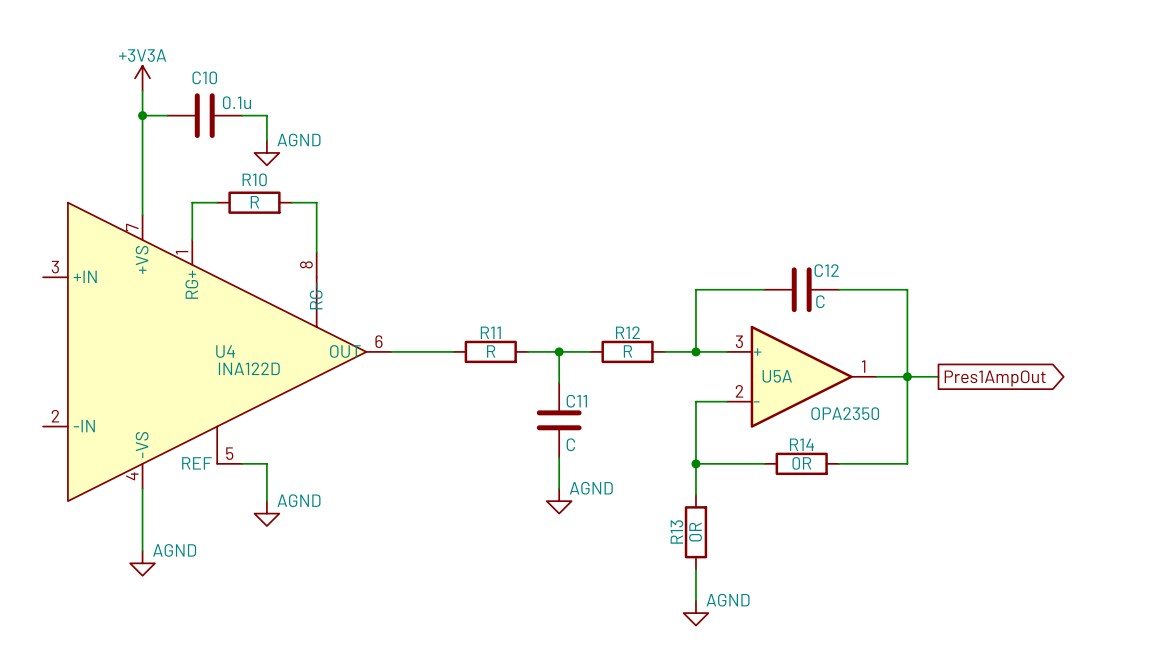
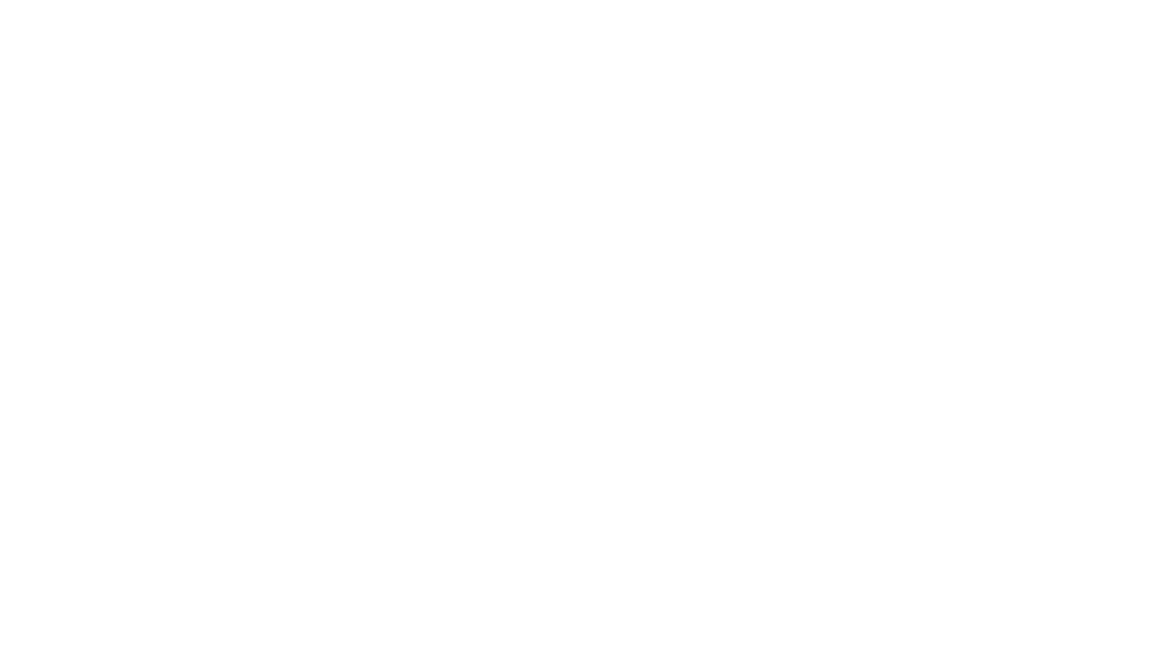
power symbol: +3V3A (142, 78) -> none
wire: (142, 90) (142, 215) -> none
wire: (142, 115) (167, 115) -> none
junction: (142, 115) -> none
C10: 0.1u (204, 115) -> none
wire: (242, 115) (266, 115) (266, 140) -> none
power symbol: AGND (266, 152) -> none
wire: (217, 202) (192, 202) (192, 239) -> none
R10: R (254, 202) -> none
wire: (291, 202) (316, 202) (316, 252) -> none
wire: (764, 289) (695, 289) (695, 351) -> none
C12: C (801, 289) -> none
wire: (839, 289) (907, 289) (907, 463) (839, 463) -> none
U4: INA122D (217, 351) -> none
wire: (391, 351) (453, 351) -> none
R11: R (490, 351) -> none
wire: (528, 351) (590, 351) -> none
wire: (559, 351) (559, 383) -> none
junction: (559, 351) -> none
R12: R (627, 351) -> none
wire: (664, 351) (727, 351) -> none
junction: (695, 351) -> none
U5A: OPA2350 (801, 376) -> none
wire: (876, 376) (938, 376) -> none
junction: (907, 376) -> none
global label: Pres1AmpOut (995, 378) -> none
wire: (727, 401) (695, 401) (695, 494) -> none
C11: C (559, 420) -> none
wire: (559, 457) (559, 488) -> none
wire: (242, 463) (266, 463) (266, 501) -> none
wire: (695, 463) (764, 463) -> none
junction: (695, 463) -> none
R14: 0R (801, 463) -> none
wire: (142, 488) (142, 550) -> none
power symbol: AGND (559, 501) -> none
power symbol: AGND (266, 513) -> none
R13: 0R (695, 532) -> none
power symbol: AGND (142, 563) -> none
wire: (695, 569) (695, 600) -> none
power symbol: AGND (695, 613) -> none

